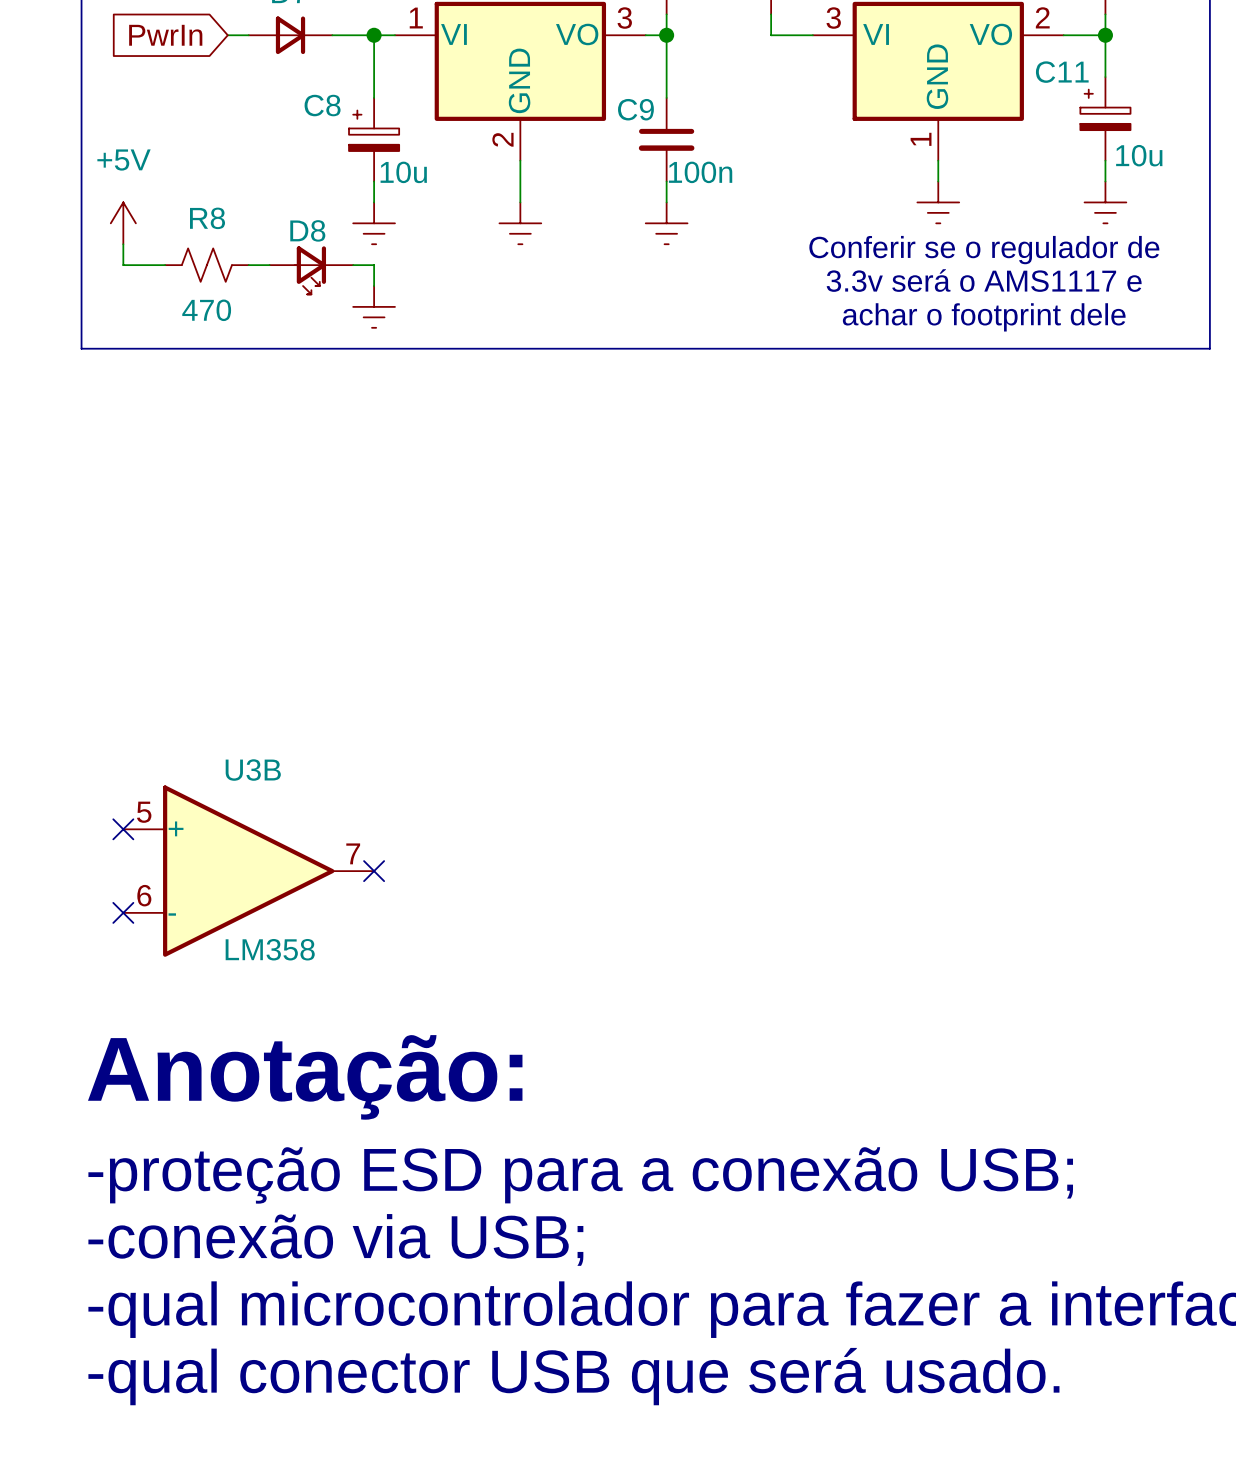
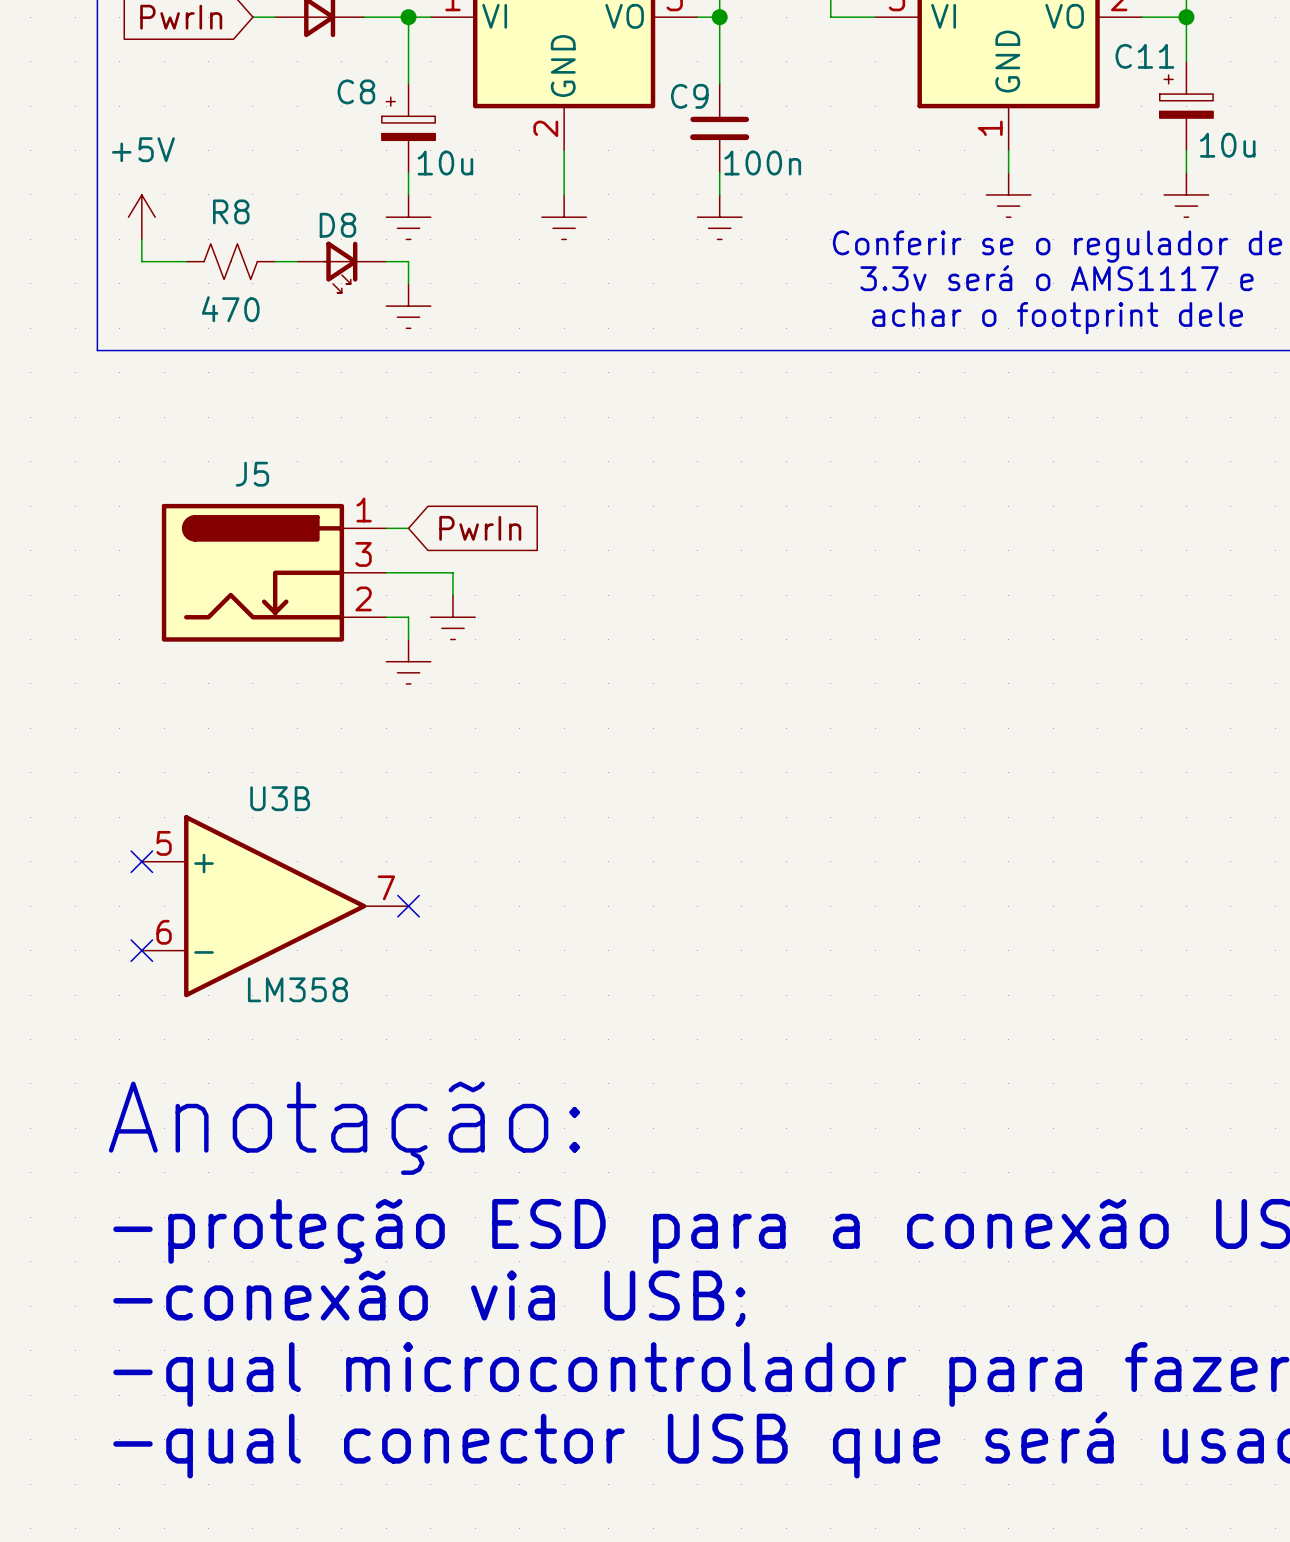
wire: none -> (386, 528) (408, 528)
global label: none -> PwrIn (480, 528)
J5: none -> (274, 572)
wire: none -> (386, 572) (452, 572) (452, 595)
wire: none -> (386, 617) (408, 617) (408, 639)
power symbol: none -> (452, 617)
power symbol: none -> (408, 661)

